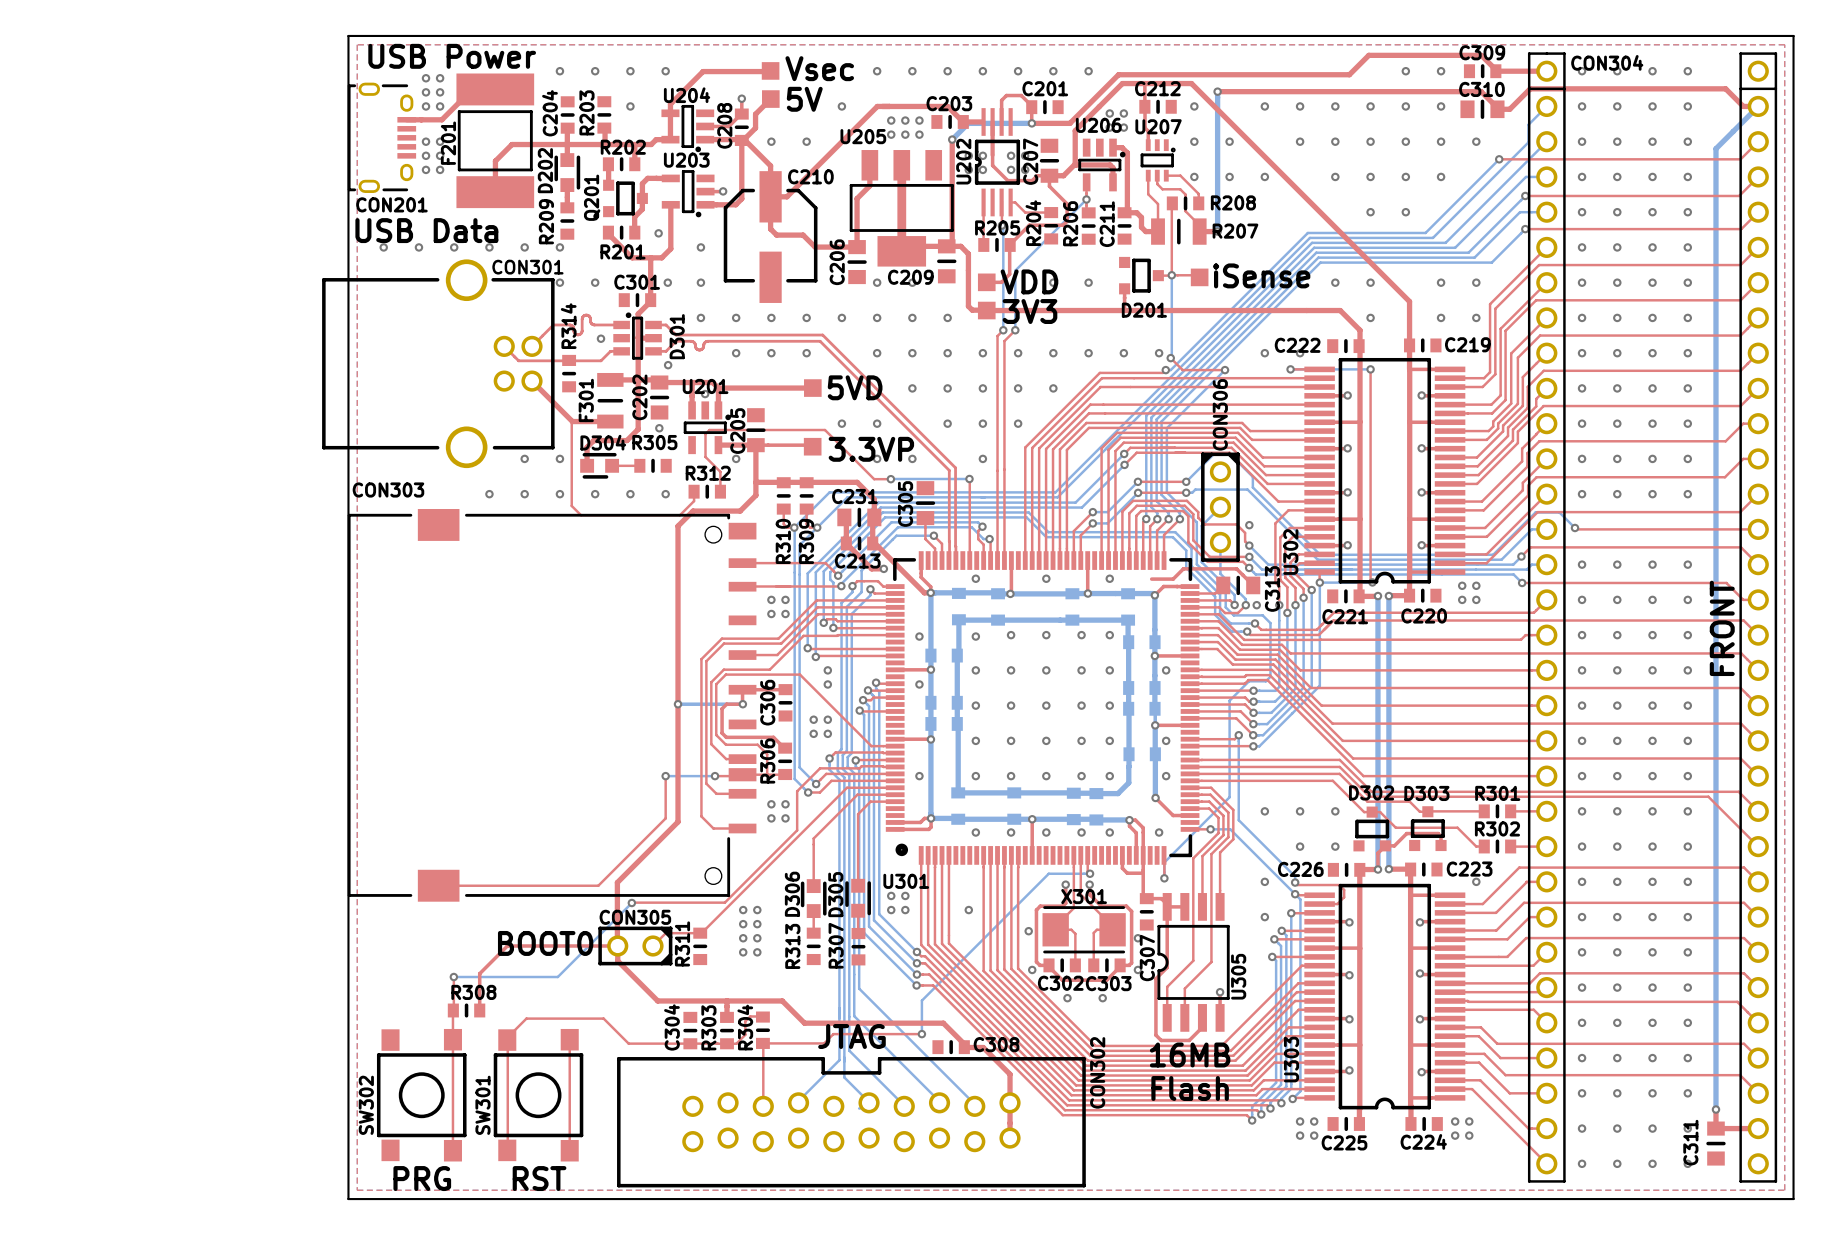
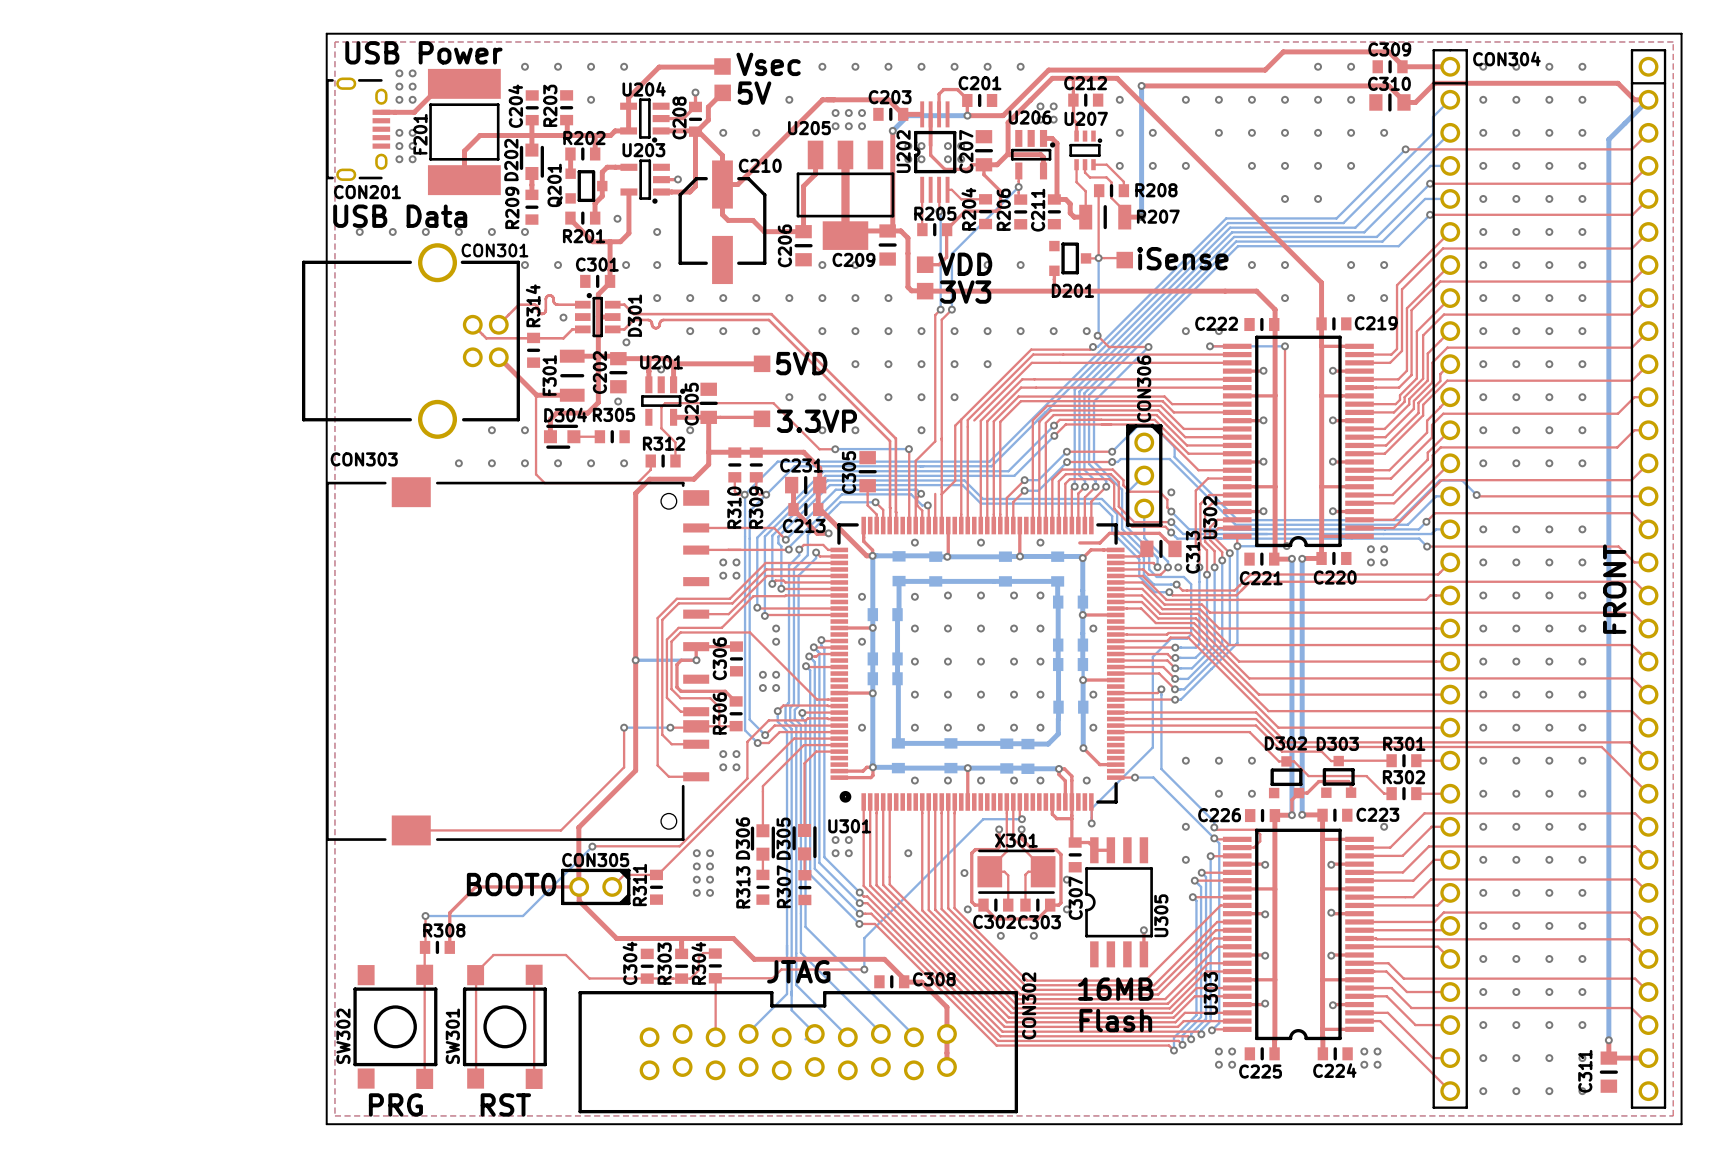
top track: none -> (961, 419) (955, 425) (955, 480) (941, 494)
top track: (1039, 448) (1039, 560) -> none
top track: (997, 470) (997, 526) -> (935, 441) (915, 460) (915, 525)
top track: (1190, 787) (1211, 787) (1233, 809) (1233, 839) (1220, 852) (1220, 906) -> none
top track: (1190, 794) (1210, 794) (1228, 812) (1228, 837) (1211, 854) (1211, 962) (1184, 988) (1184, 1017) -> none
top track: (1190, 801) (1209, 801) (1223, 815) (1223, 835) (1202, 856) (1202, 906) -> none
top track: (1190, 808) (1209, 808) (1218, 817) (1218, 833) (1193, 858) (1193, 960) (1167, 986) (1167, 1017) -> none
top track: (1167, 906) (1167, 967) (1155, 978) (1155, 1035) (1161, 1040) (1189, 1040) (1202, 1027) -> none

